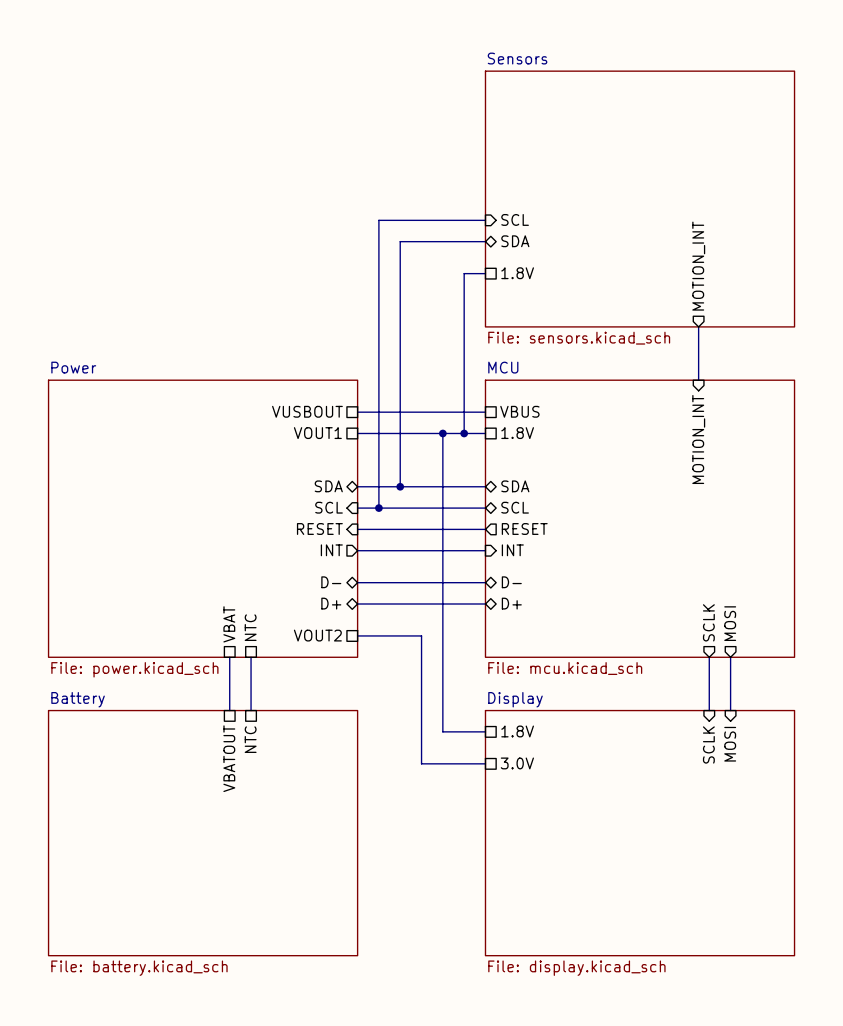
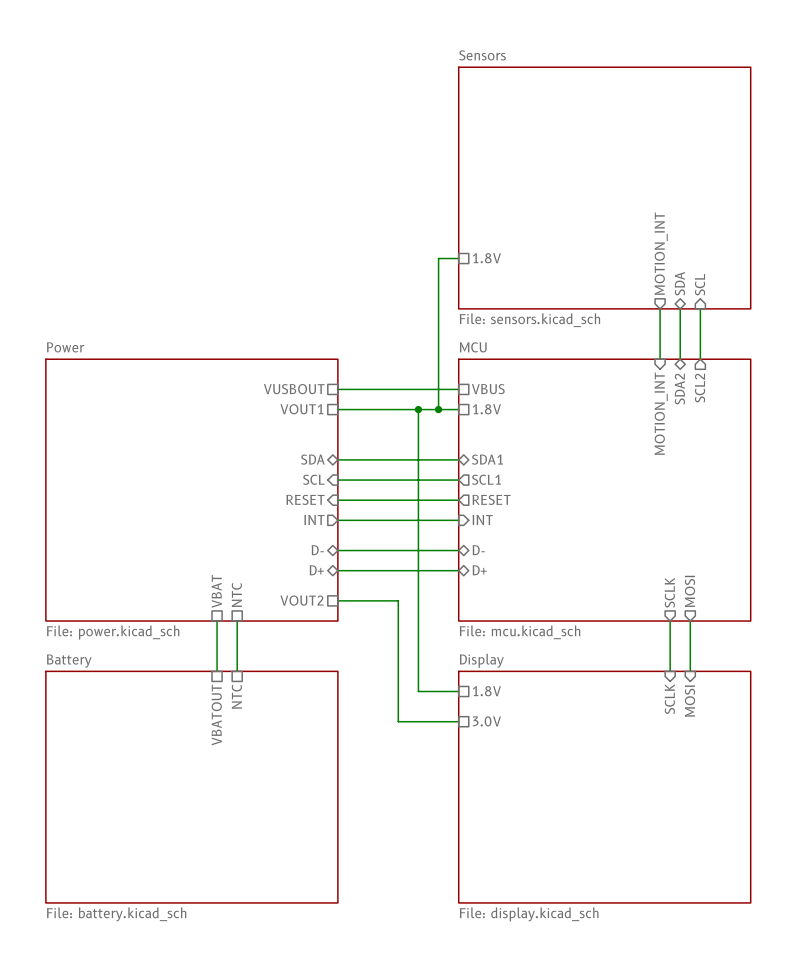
sheet pin: SCL (515, 219) -> none
wire: (485, 220) (378, 220) (378, 508) -> none
wire: (485, 241) (400, 241) (400, 486) -> none
sheet pin: SDA (515, 241) -> none
sheet pin: none -> SDA (679, 283)
sheet pin: none -> SCL (700, 284)
wire: none -> (680, 308) (680, 359)
wire: none -> (700, 308) (700, 359)
sheet pin: none -> SDA2 (679, 389)
sheet pin: none -> SCL2 (700, 388)
junction: (400, 486) -> none
sheet pin: SDA (515, 486) -> SDA1 (487, 459)
sheet pin shape: bidirectional (515, 507) -> output (486, 479)
sheet pin: SCL (515, 507) -> SCL1 (486, 479)
junction: (378, 508) -> none

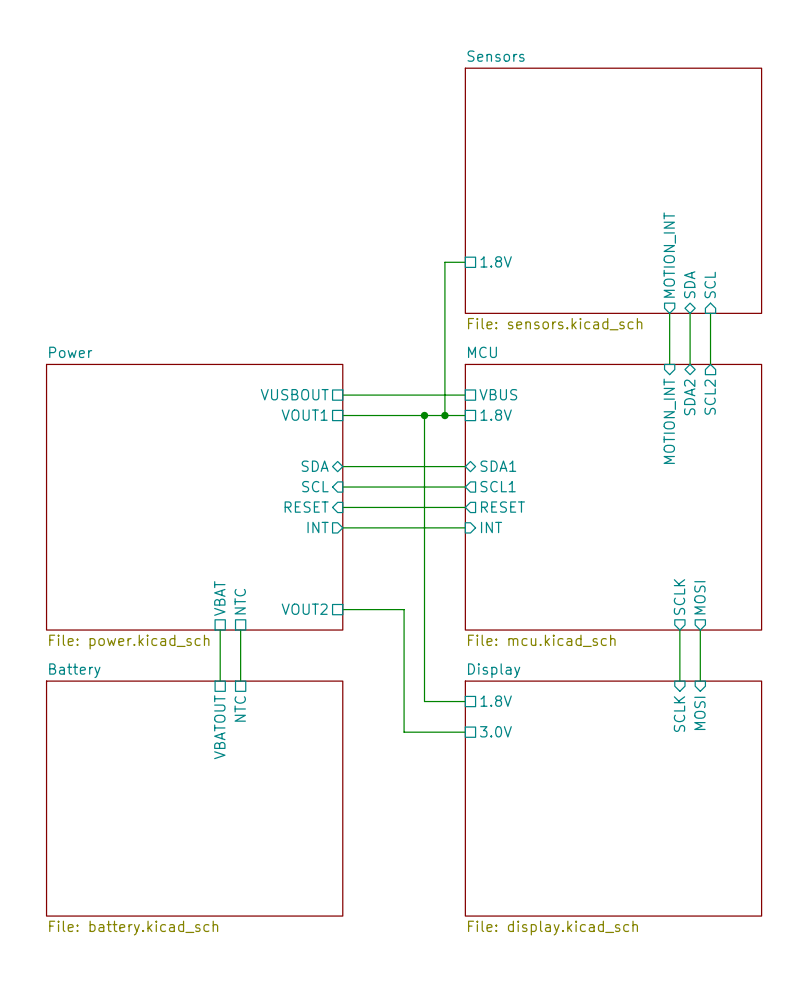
sheet pin: D- (317, 550) -> none
wire: (337, 550) (458, 550) -> none
sheet pin: D- (478, 550) -> none
sheet pin: D+ (316, 570) -> none
wire: (337, 570) (458, 570) -> none
sheet pin: D+ (479, 570) -> none

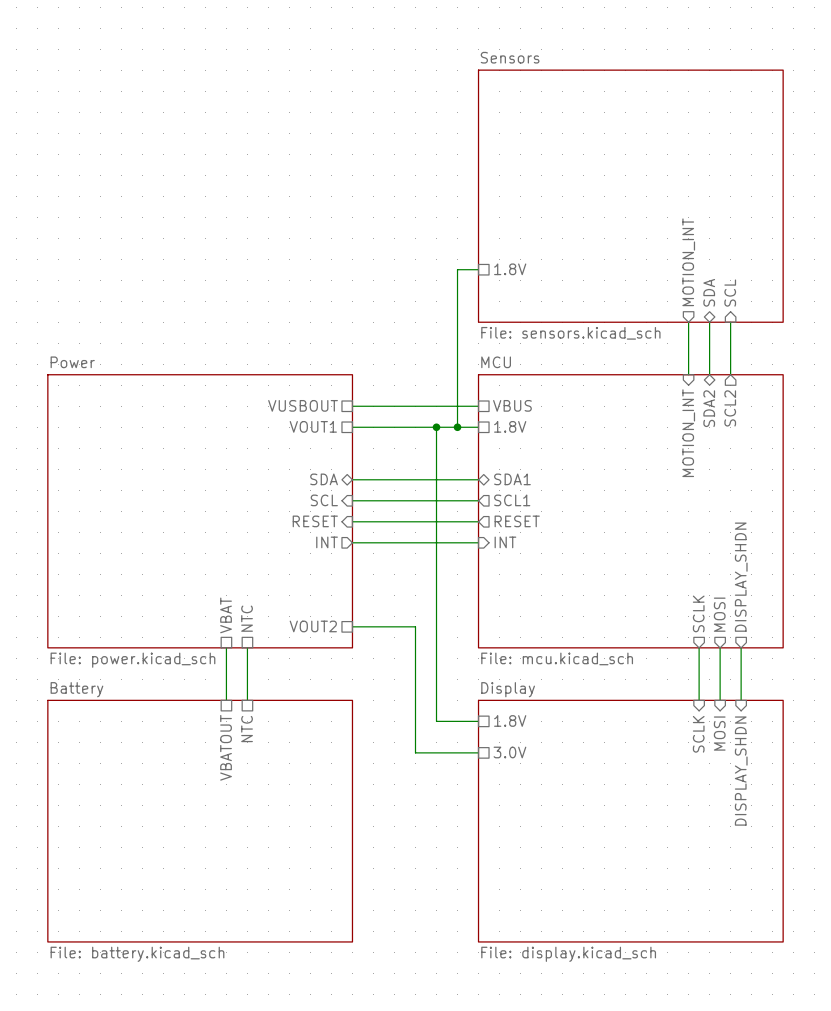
sheet pin: none -> DISPLAY_SHDN (741, 577)
wire: none -> (741, 647) (741, 700)
sheet pin: none -> DISPLAY_SHDN (741, 771)

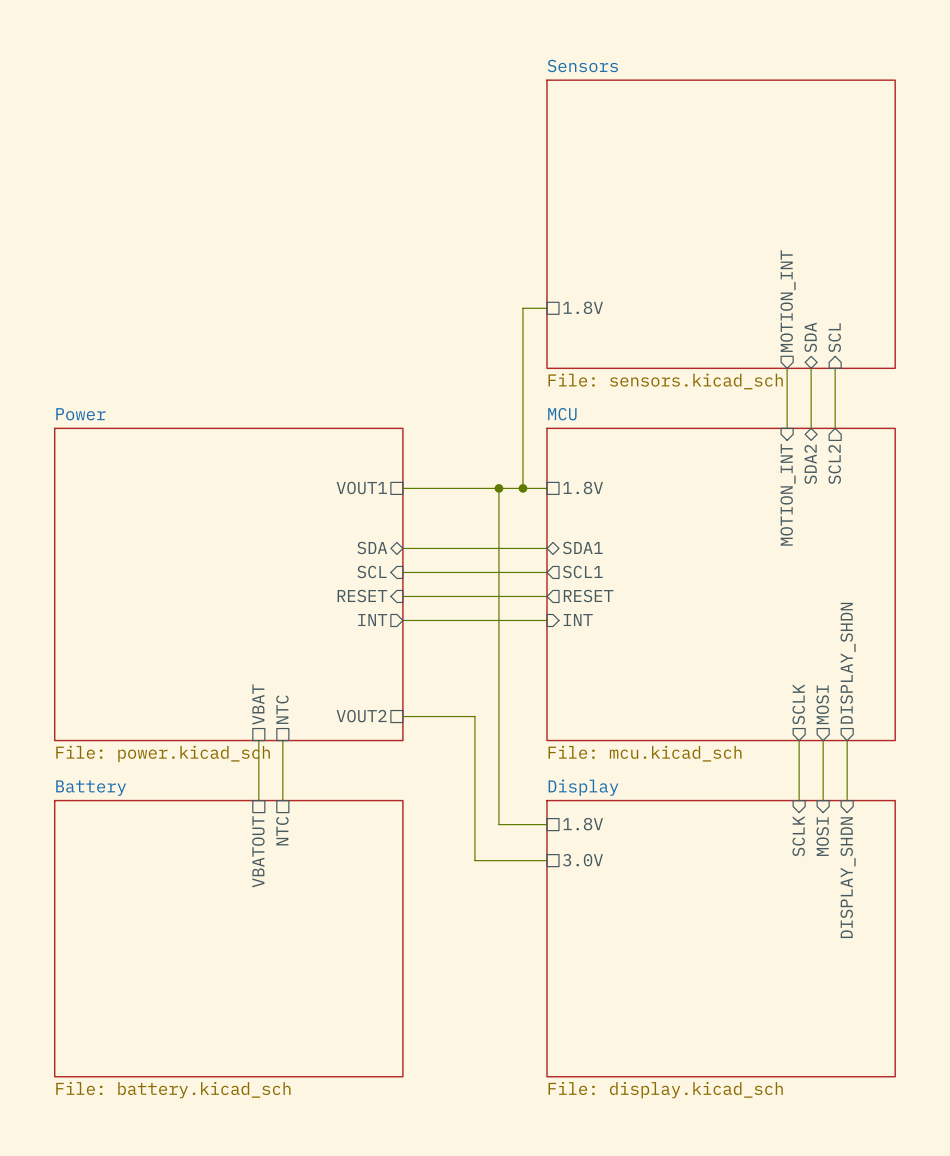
sheet pin: VUSBOUT (303, 405) -> none
sheet pin: VBUS (512, 405) -> none
wire: (352, 406) (478, 406) -> none

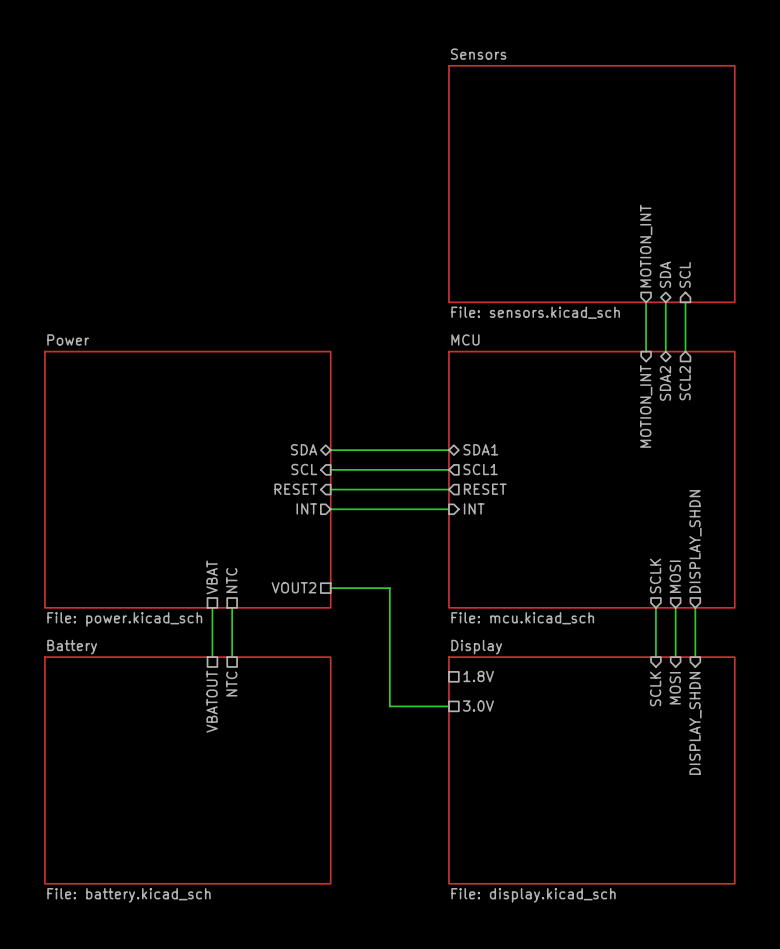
sheet pin: 1.8V (583, 307) -> none
wire: (546, 308) (522, 308) (522, 488) -> none
sheet pin: VOUT1 (361, 487) -> none
sheet pin: 1.8V (583, 487) -> none
wire: (402, 488) (546, 488) -> none
wire: (498, 488) (498, 824) (546, 824) -> none
junction: (498, 488) -> none
junction: (522, 488) -> none

